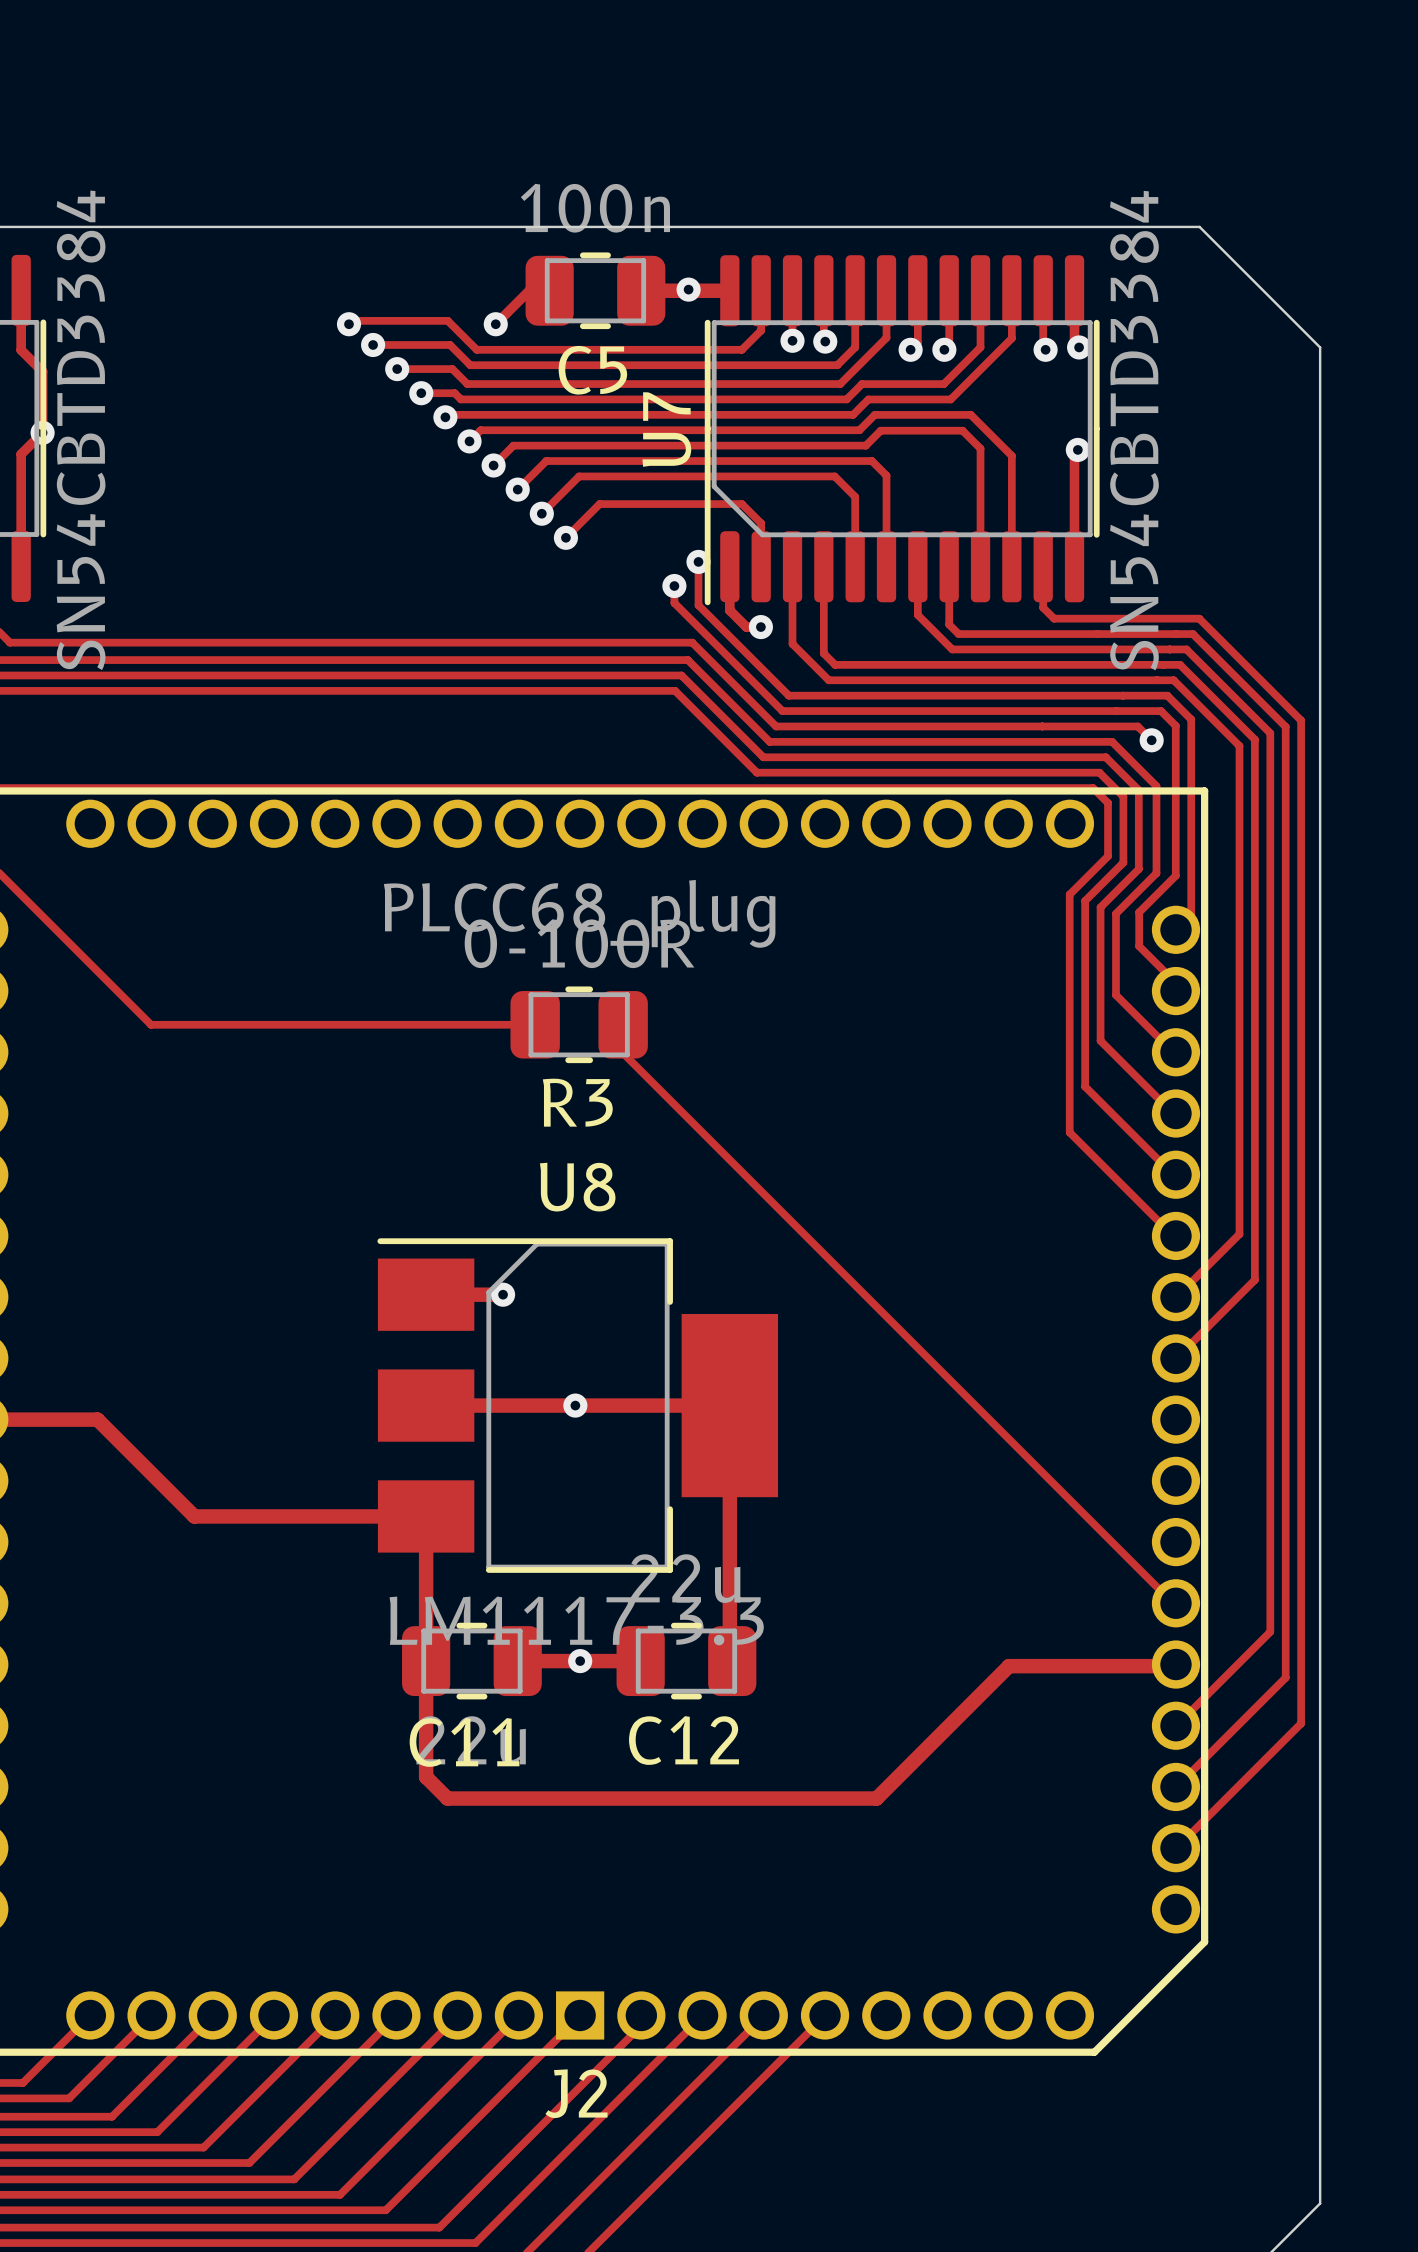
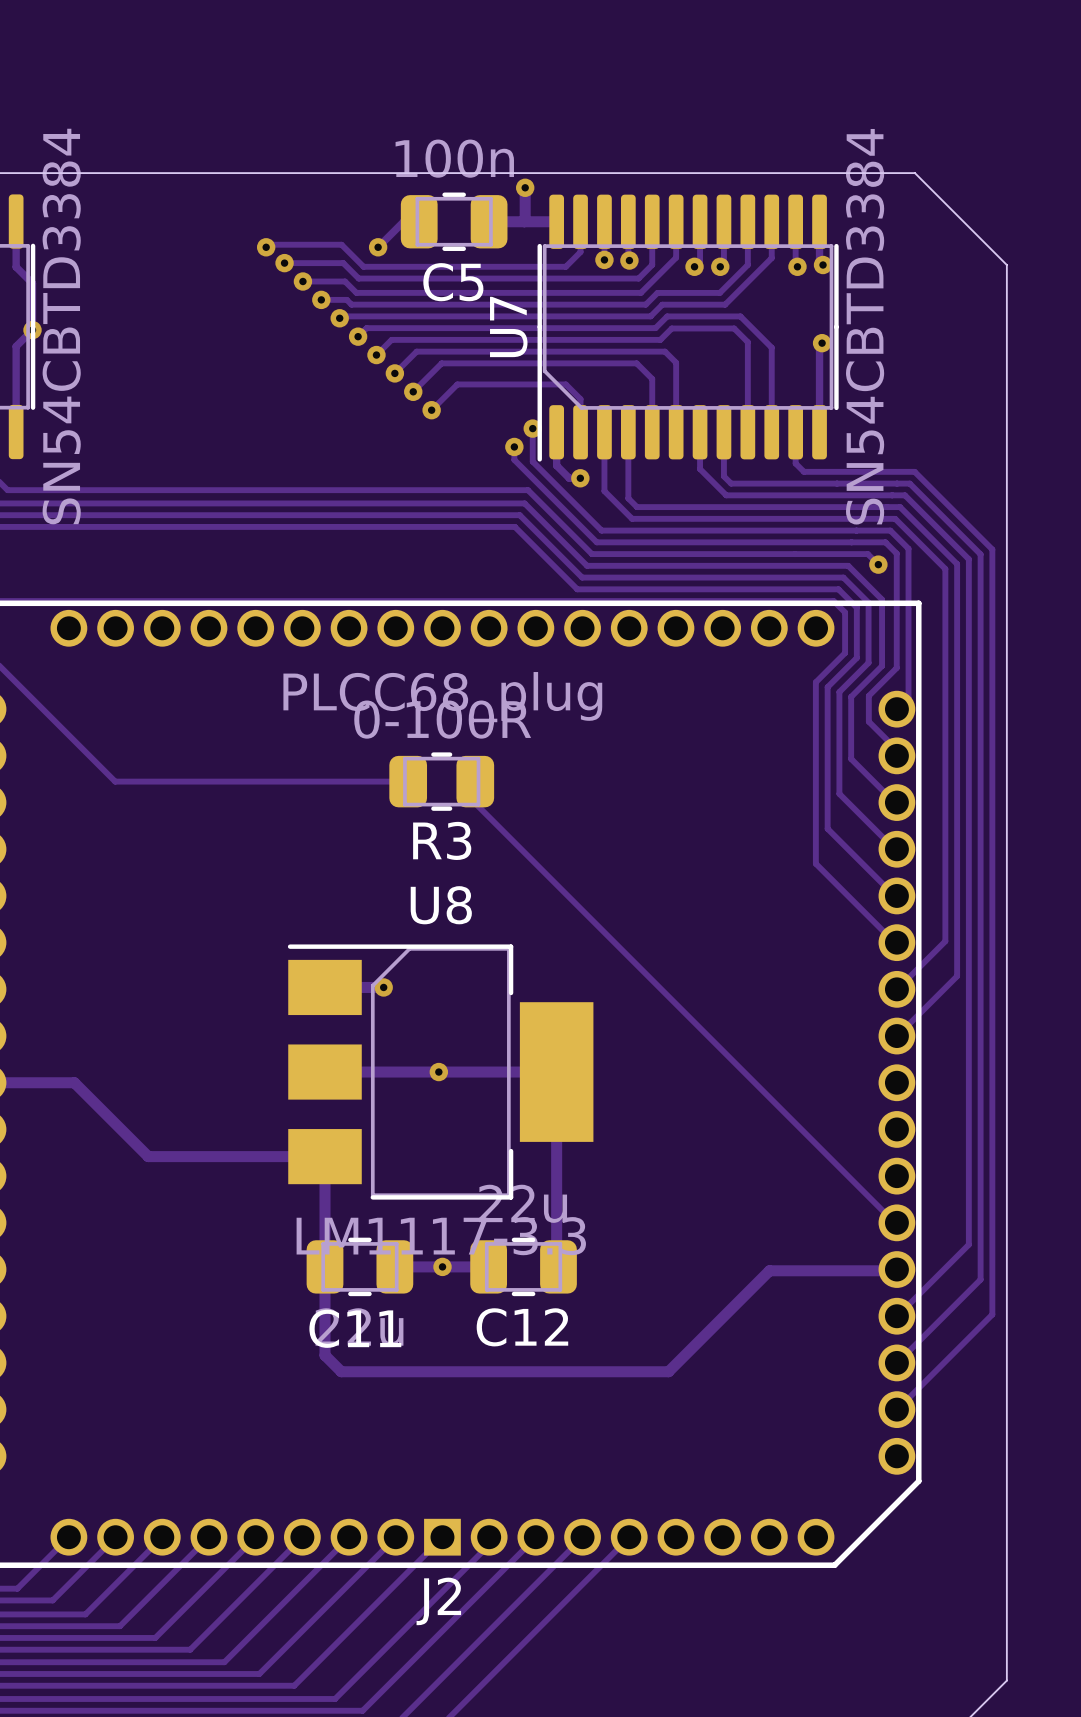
track: none -> (525, 187) (525, 220)
via position: (688, 289) -> (525, 187)

